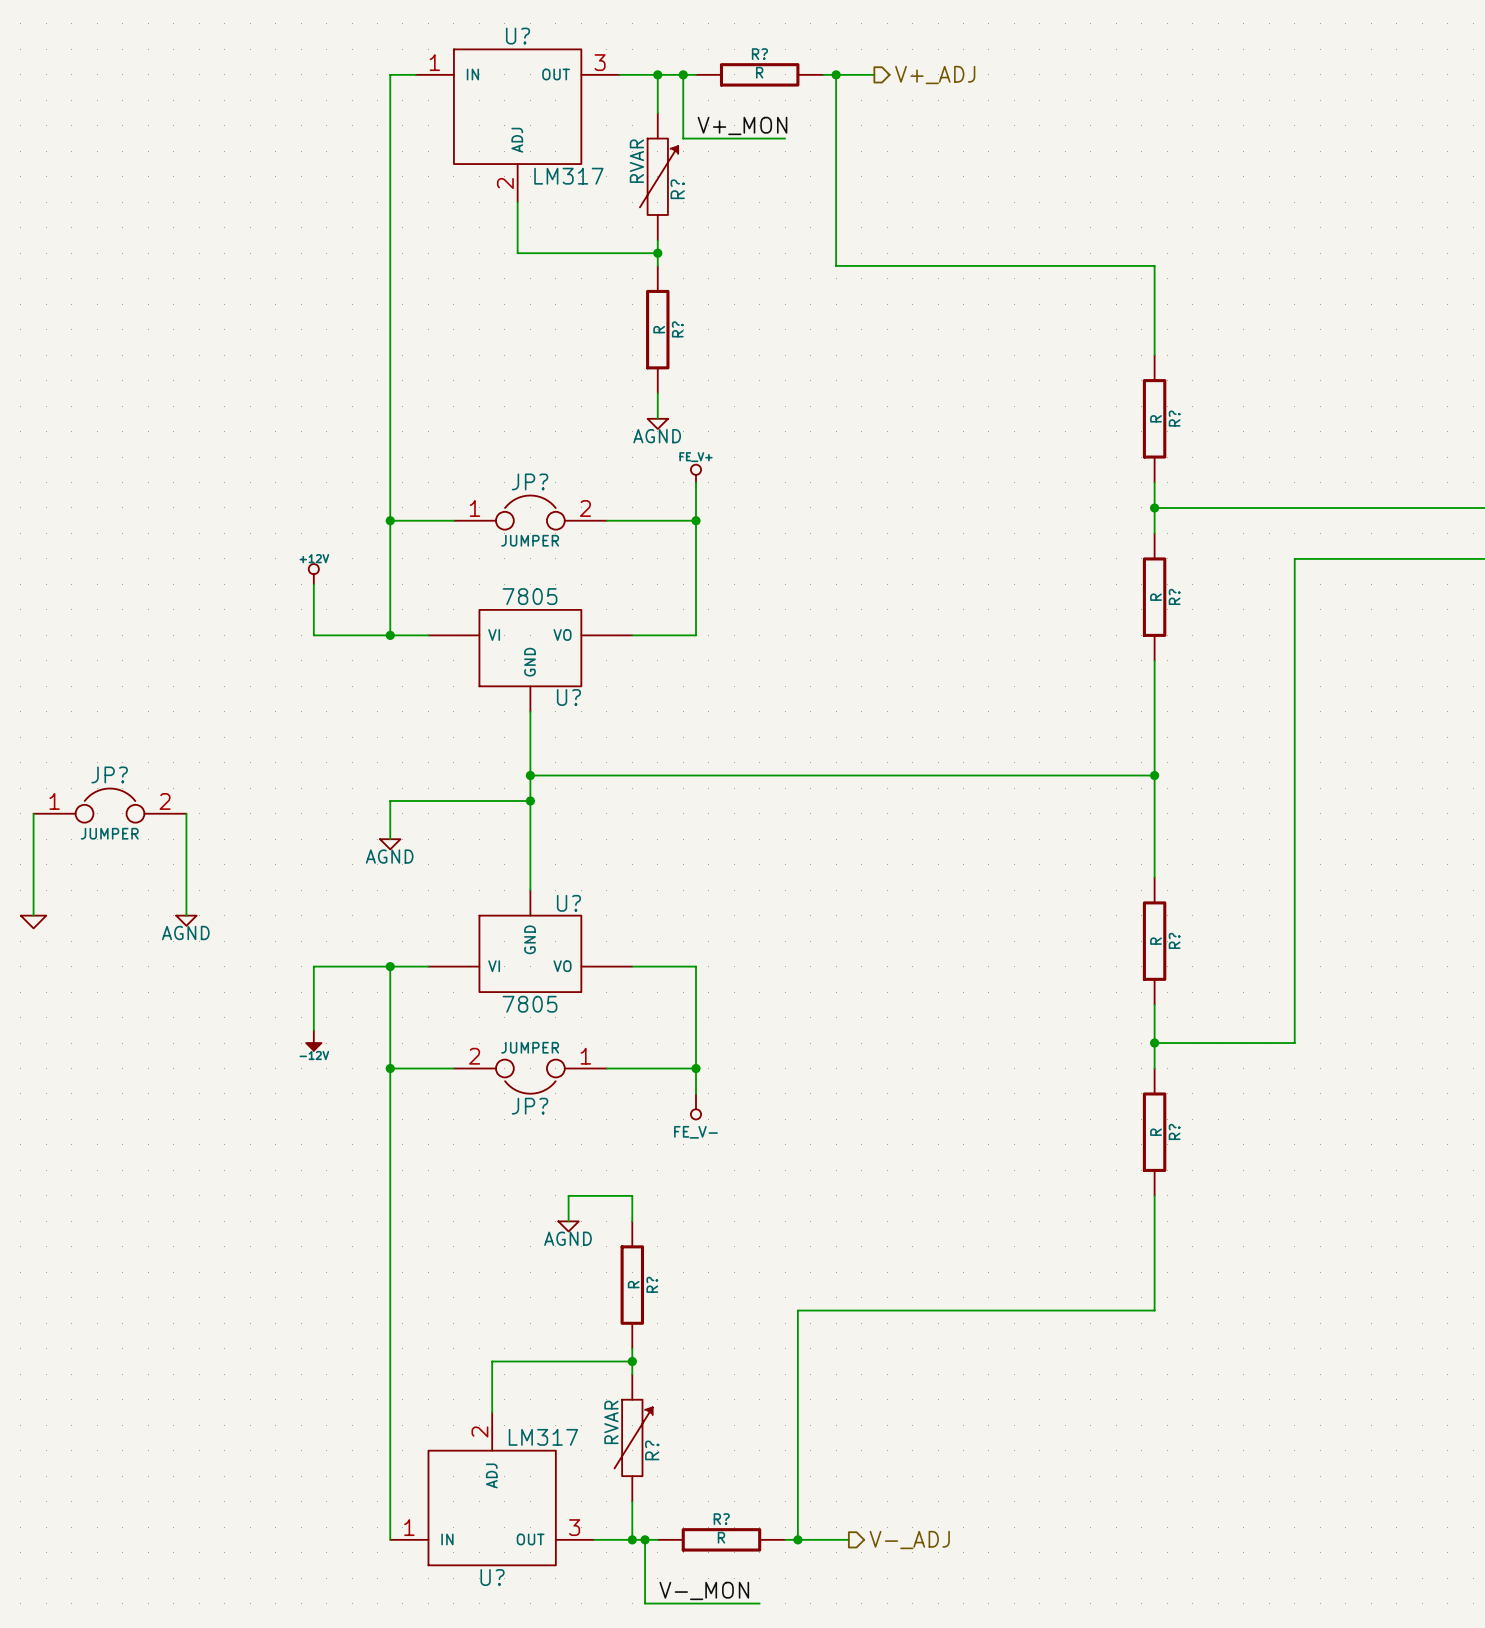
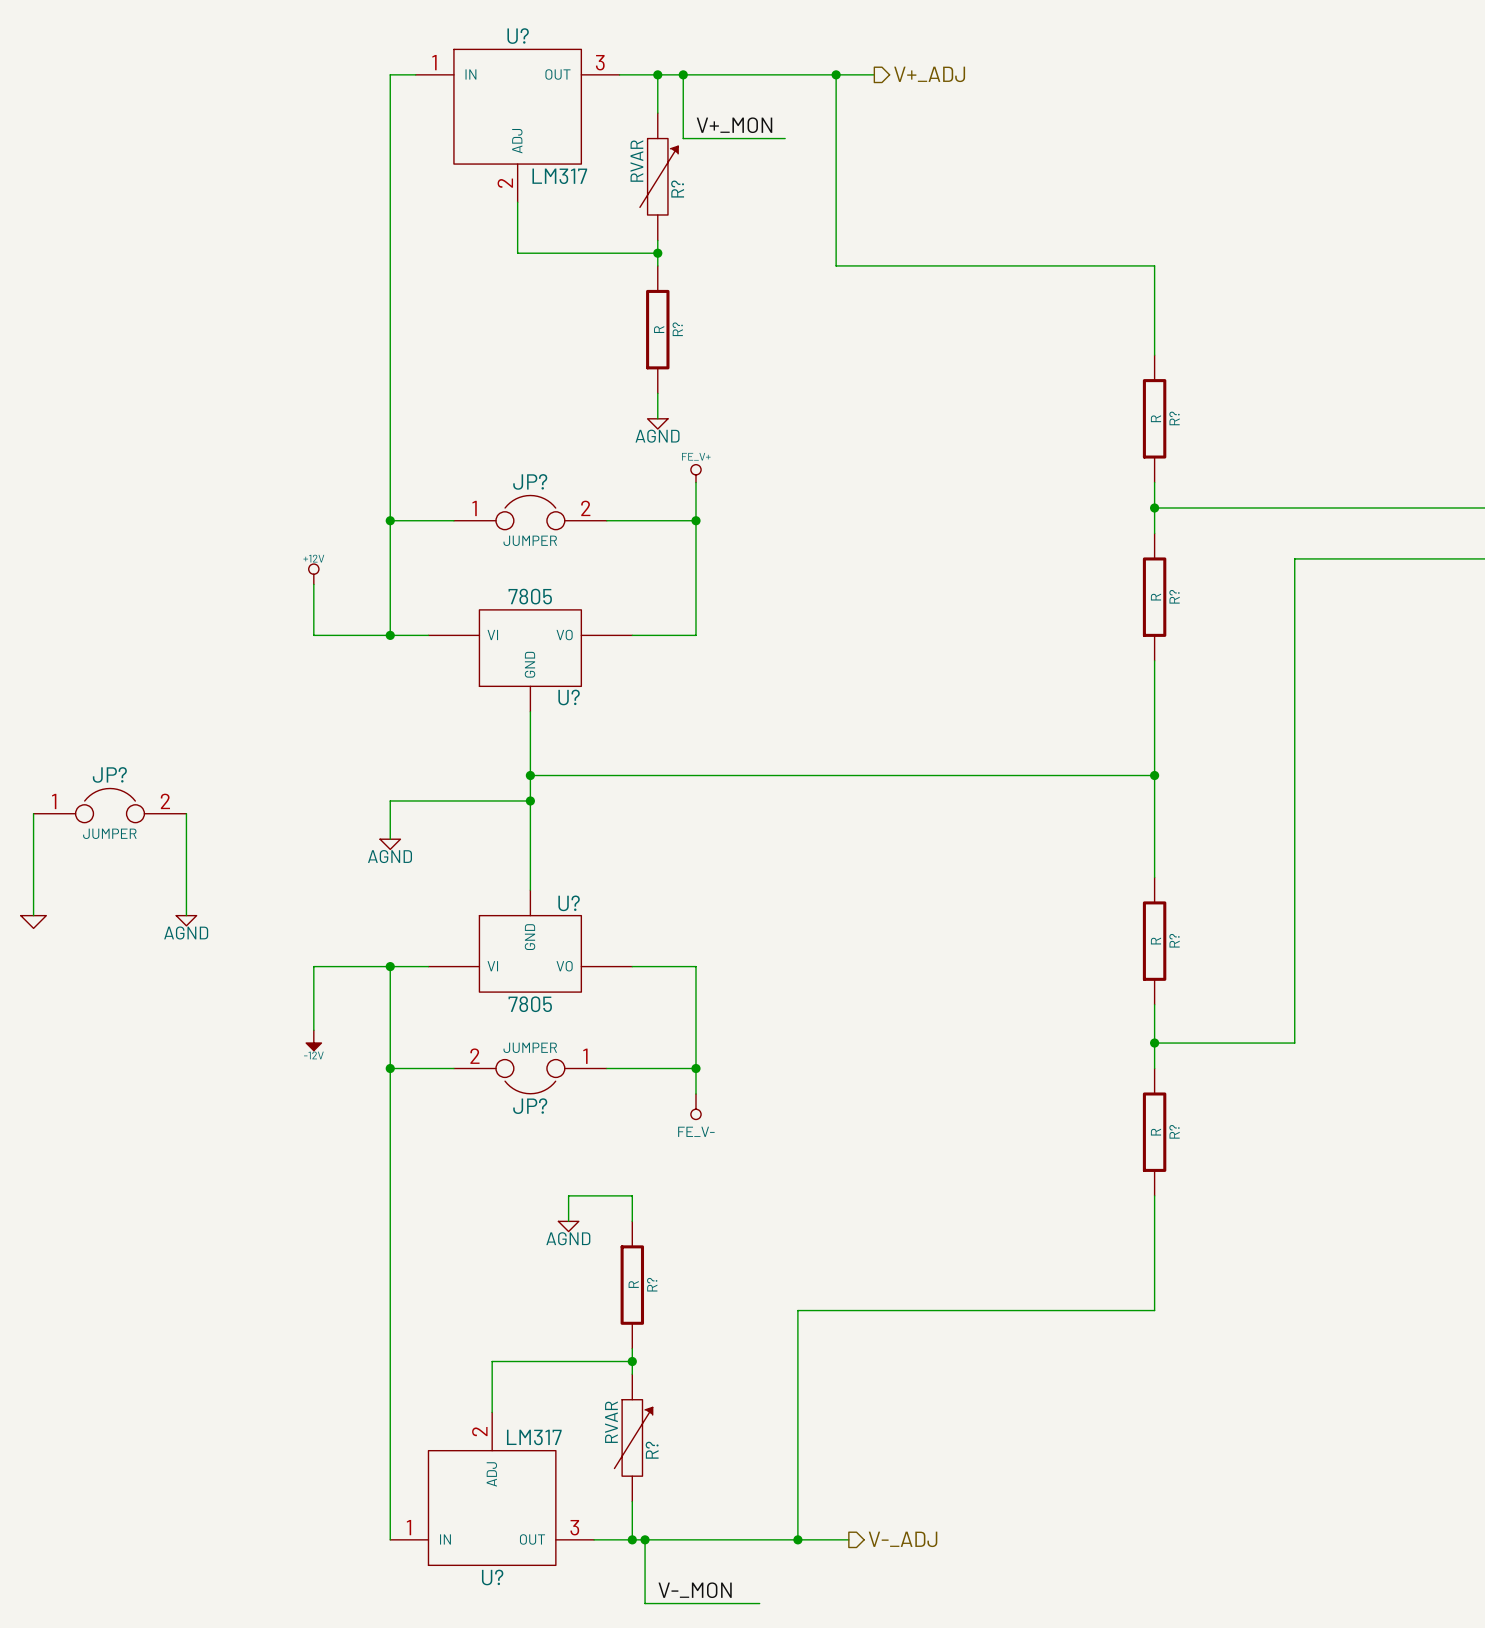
wire: none -> (695, 74) (823, 74)
R?: R (759, 74) -> none
wire: none -> (657, 1539) (785, 1539)
R?: R (721, 1539) -> none

